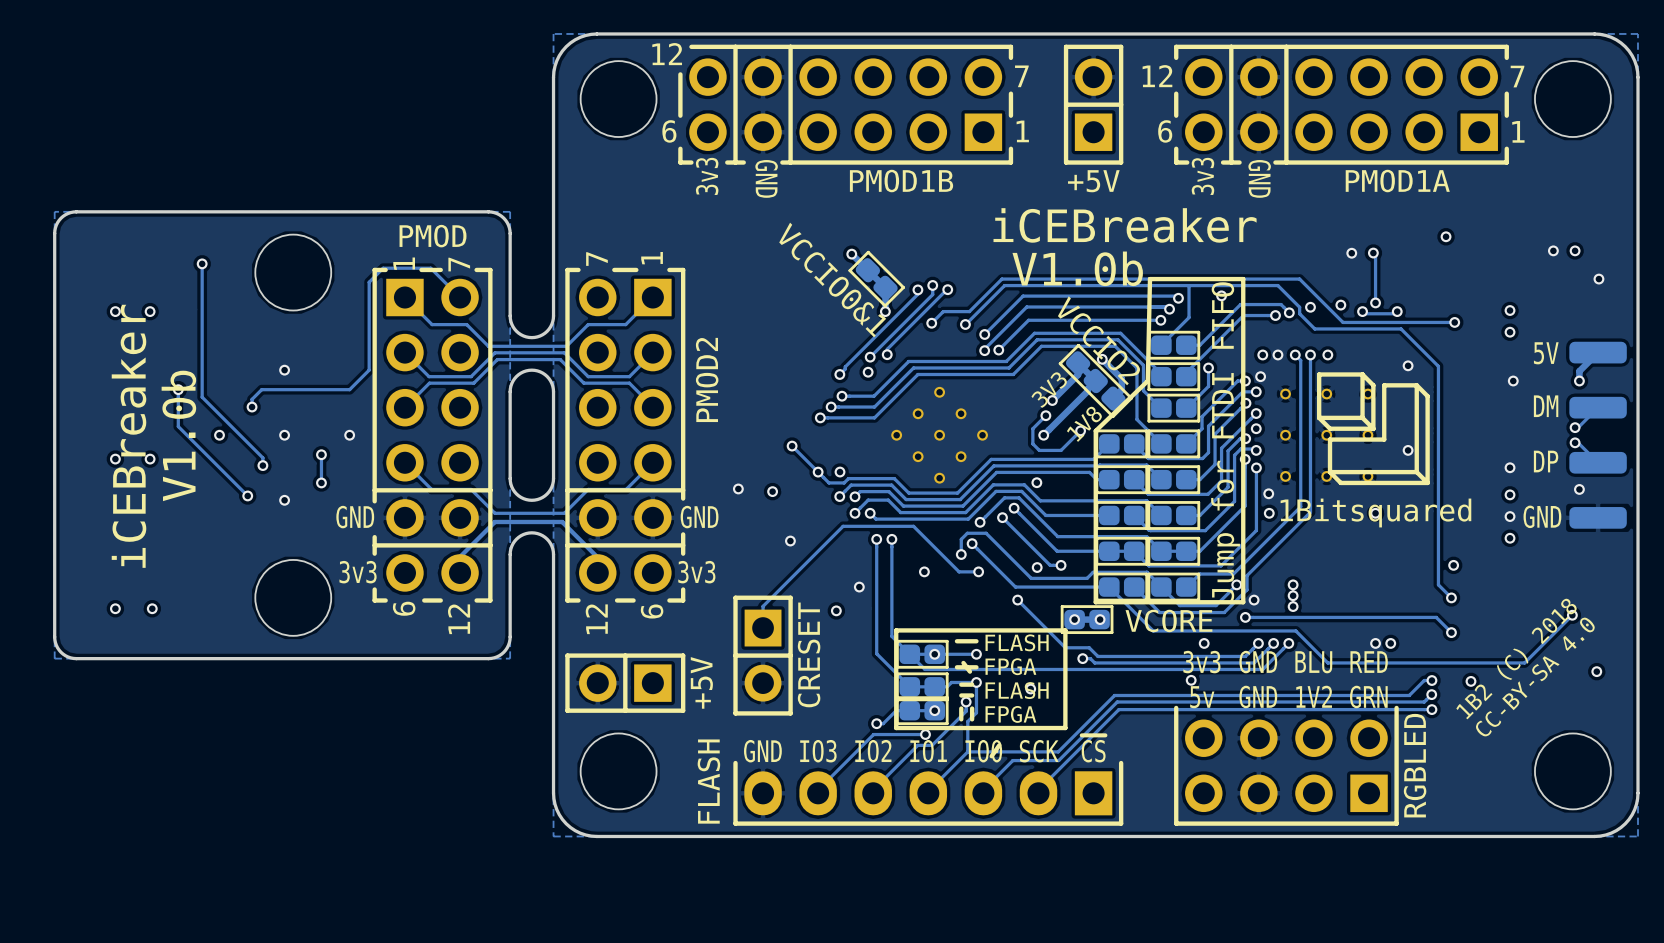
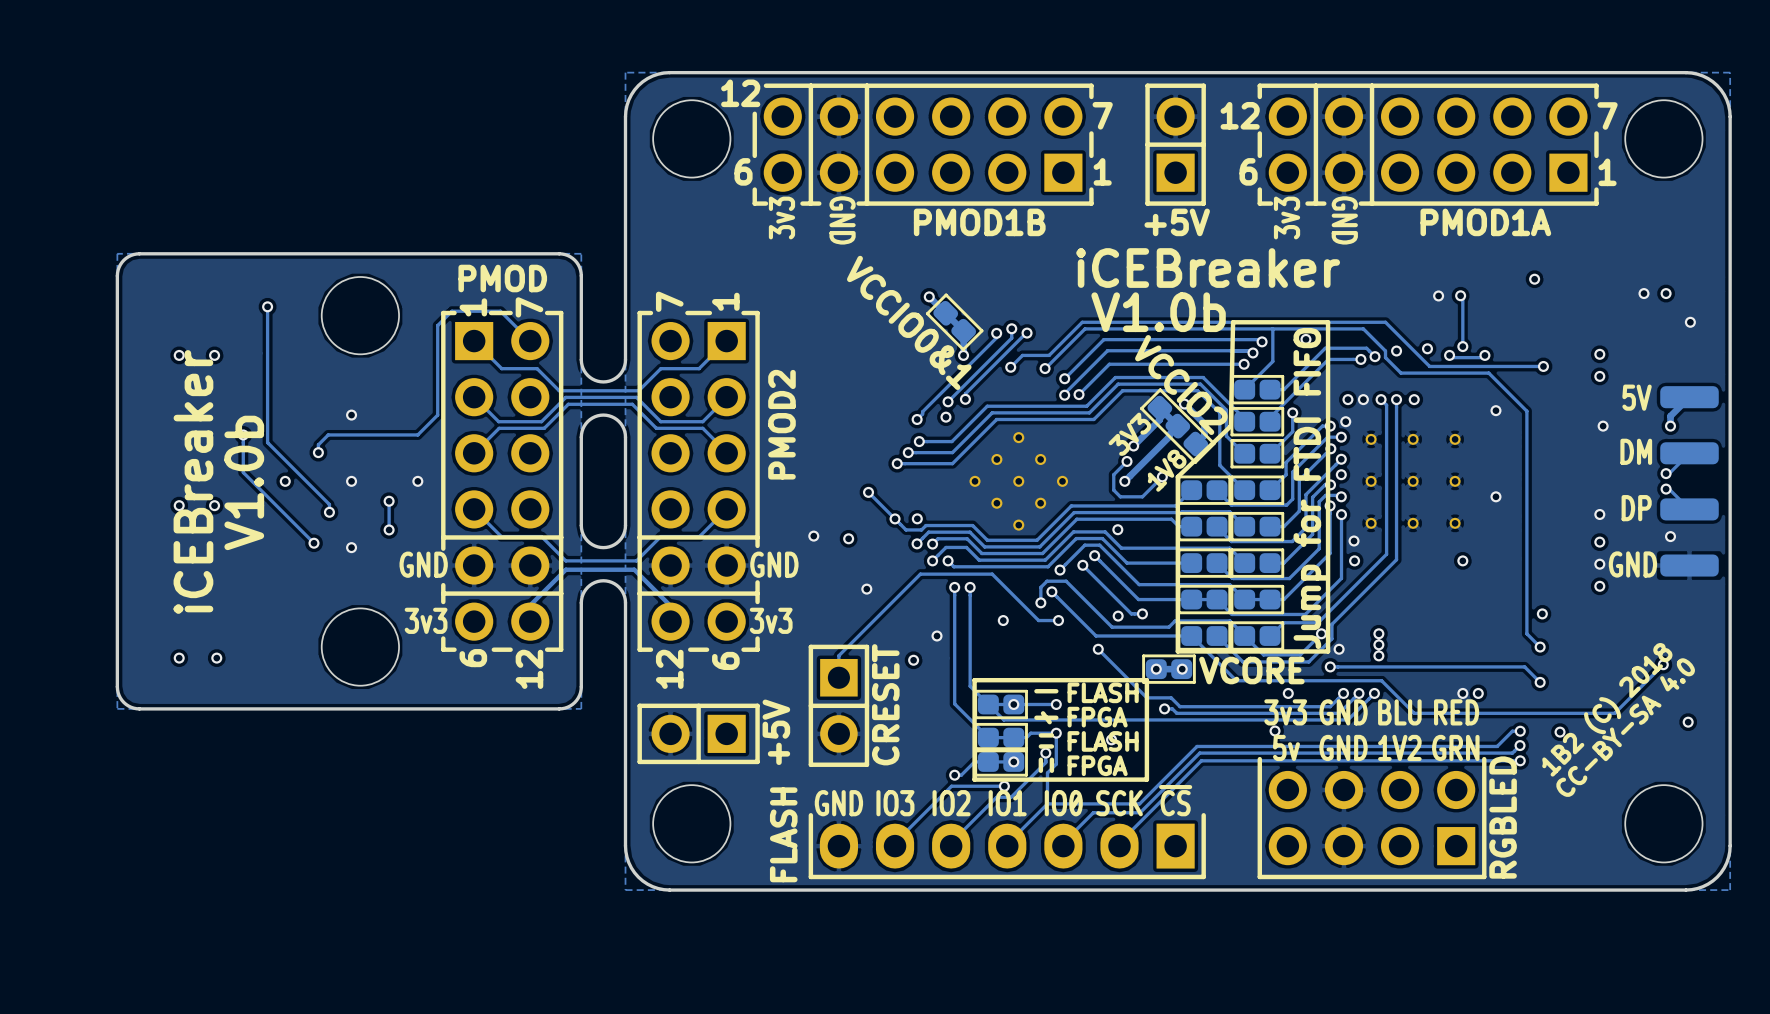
drawing: [1316, 372, 1430, 486] -> none
text: 1Bitsquared (1375, 512) -> none

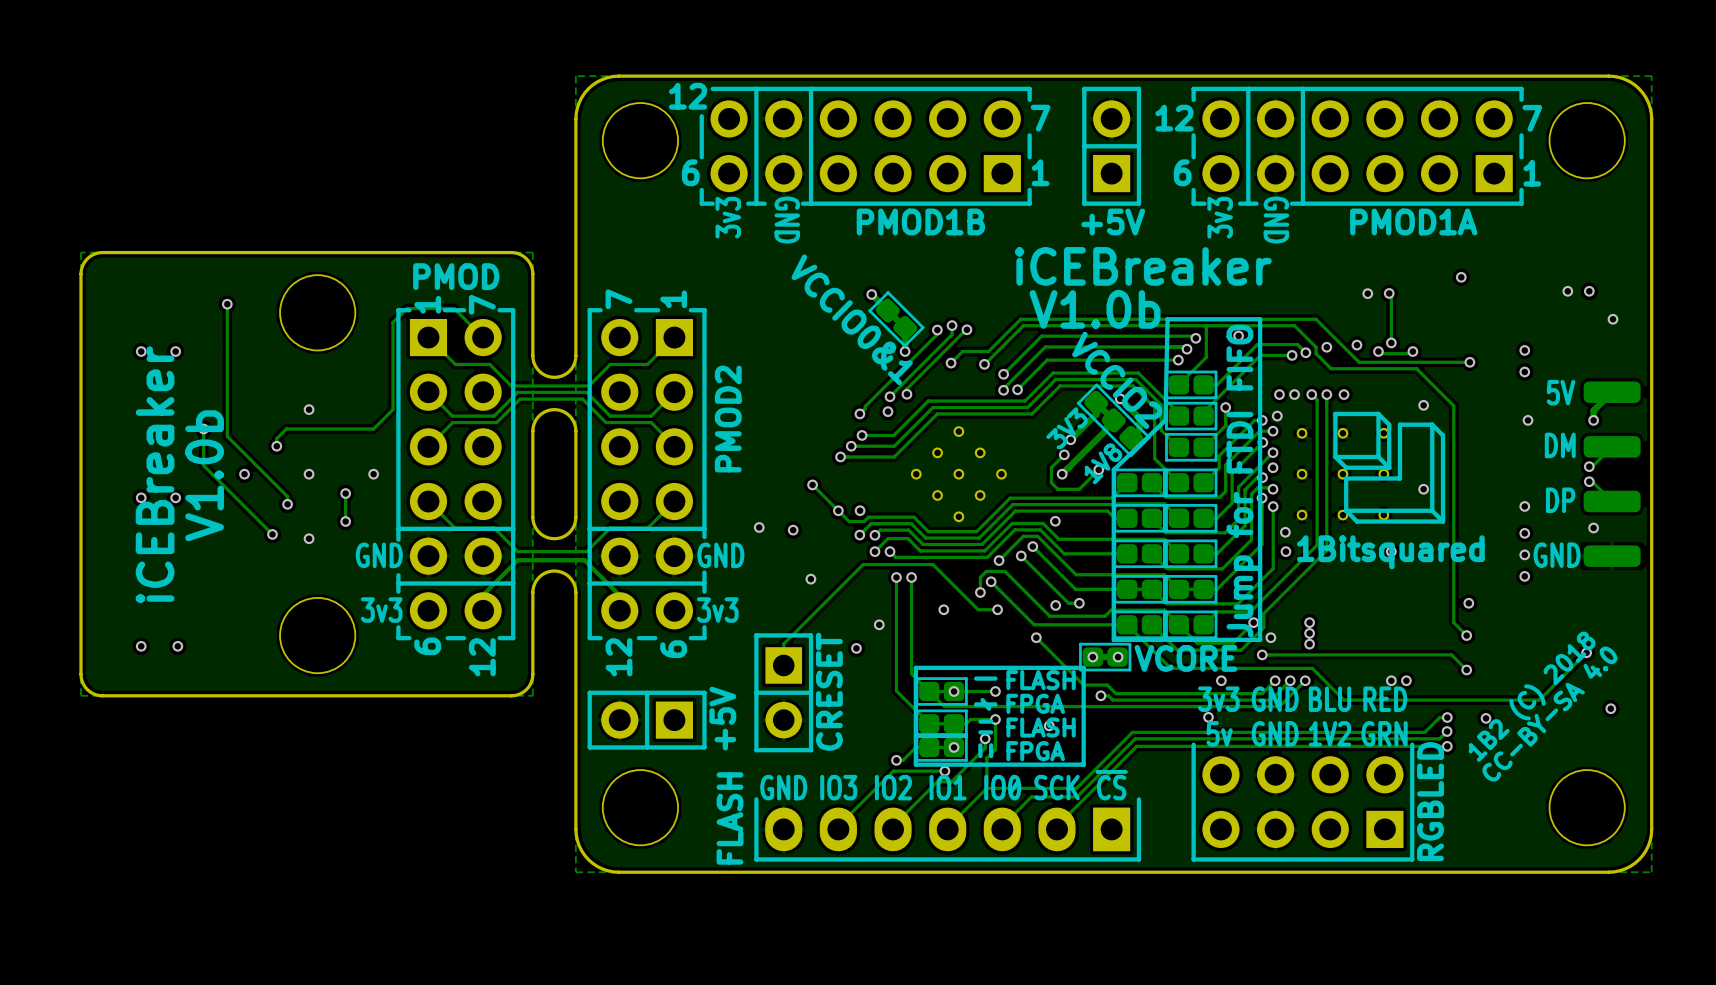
drawing: none -> [1333, 411, 1446, 524]
text: none -> 1Bitsquared (1390, 552)

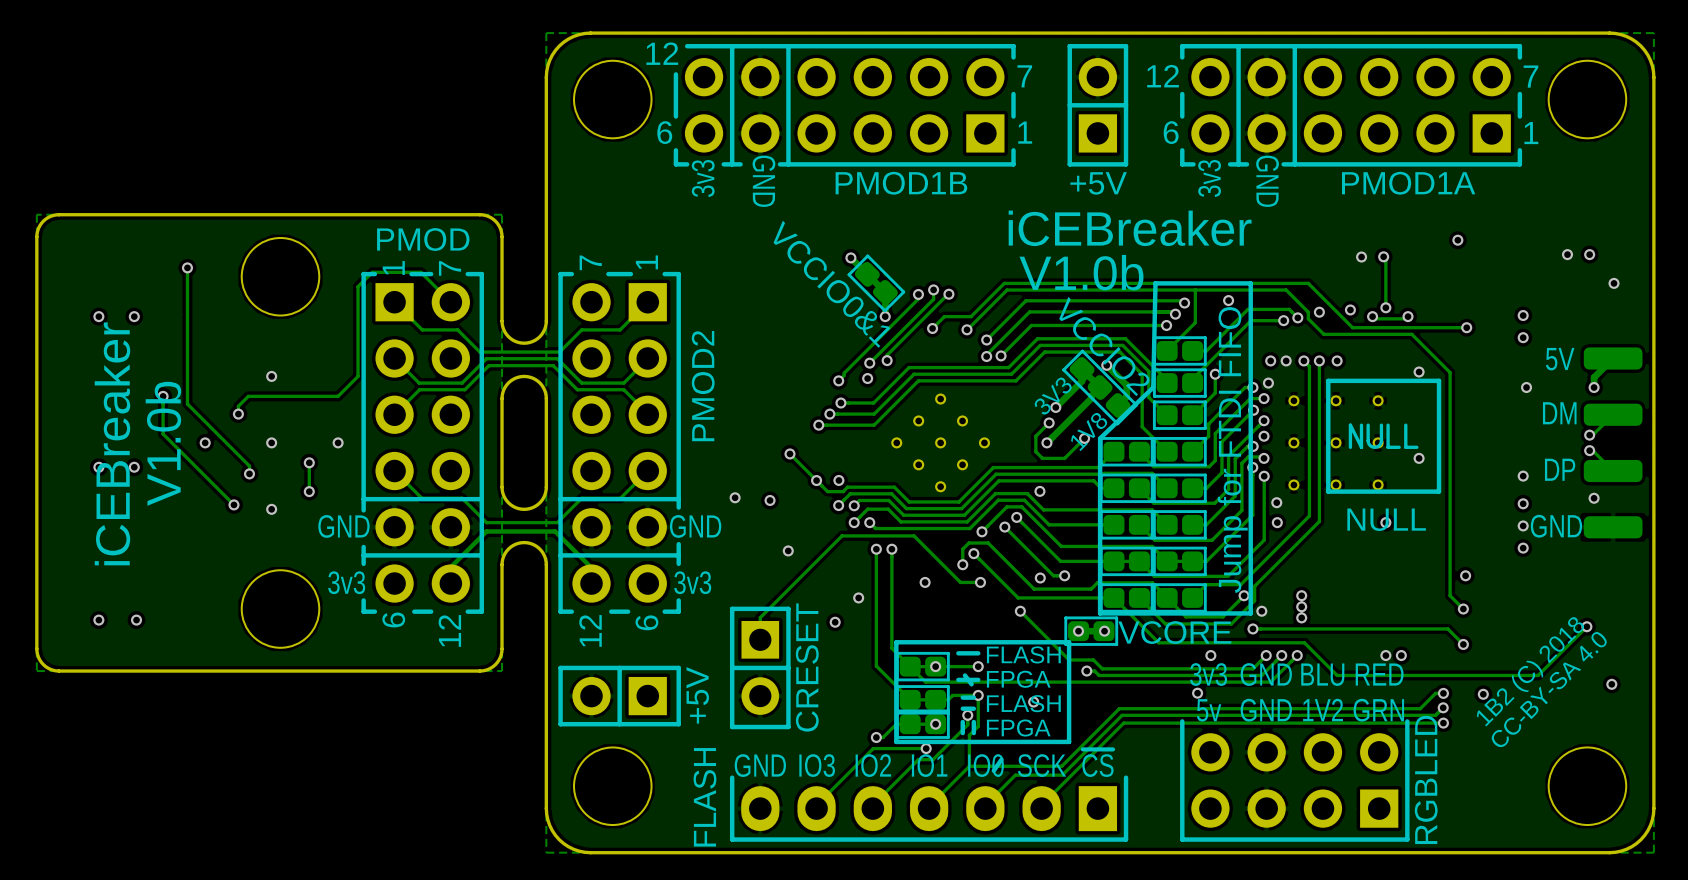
drawing shape: [1333, 411, 1446, 524] -> [1326, 378, 1442, 494]
text: 1Bitsquared (1390, 552) -> NULL (1386, 519)

